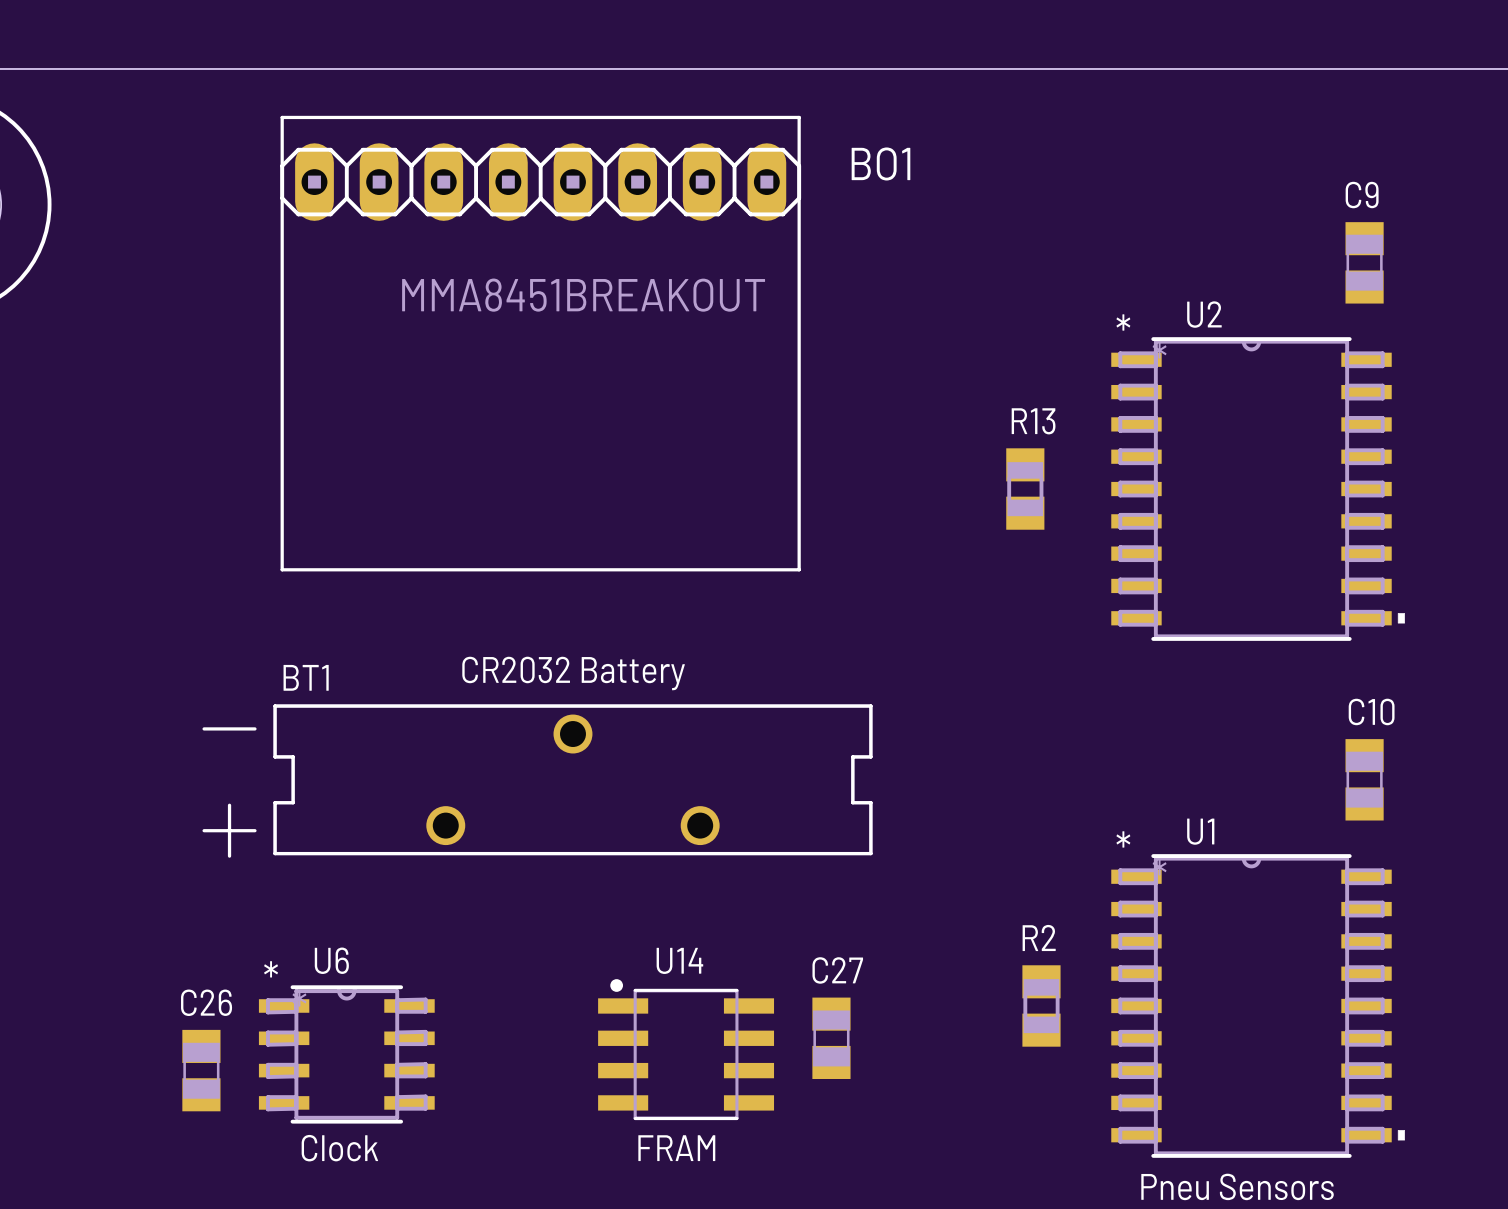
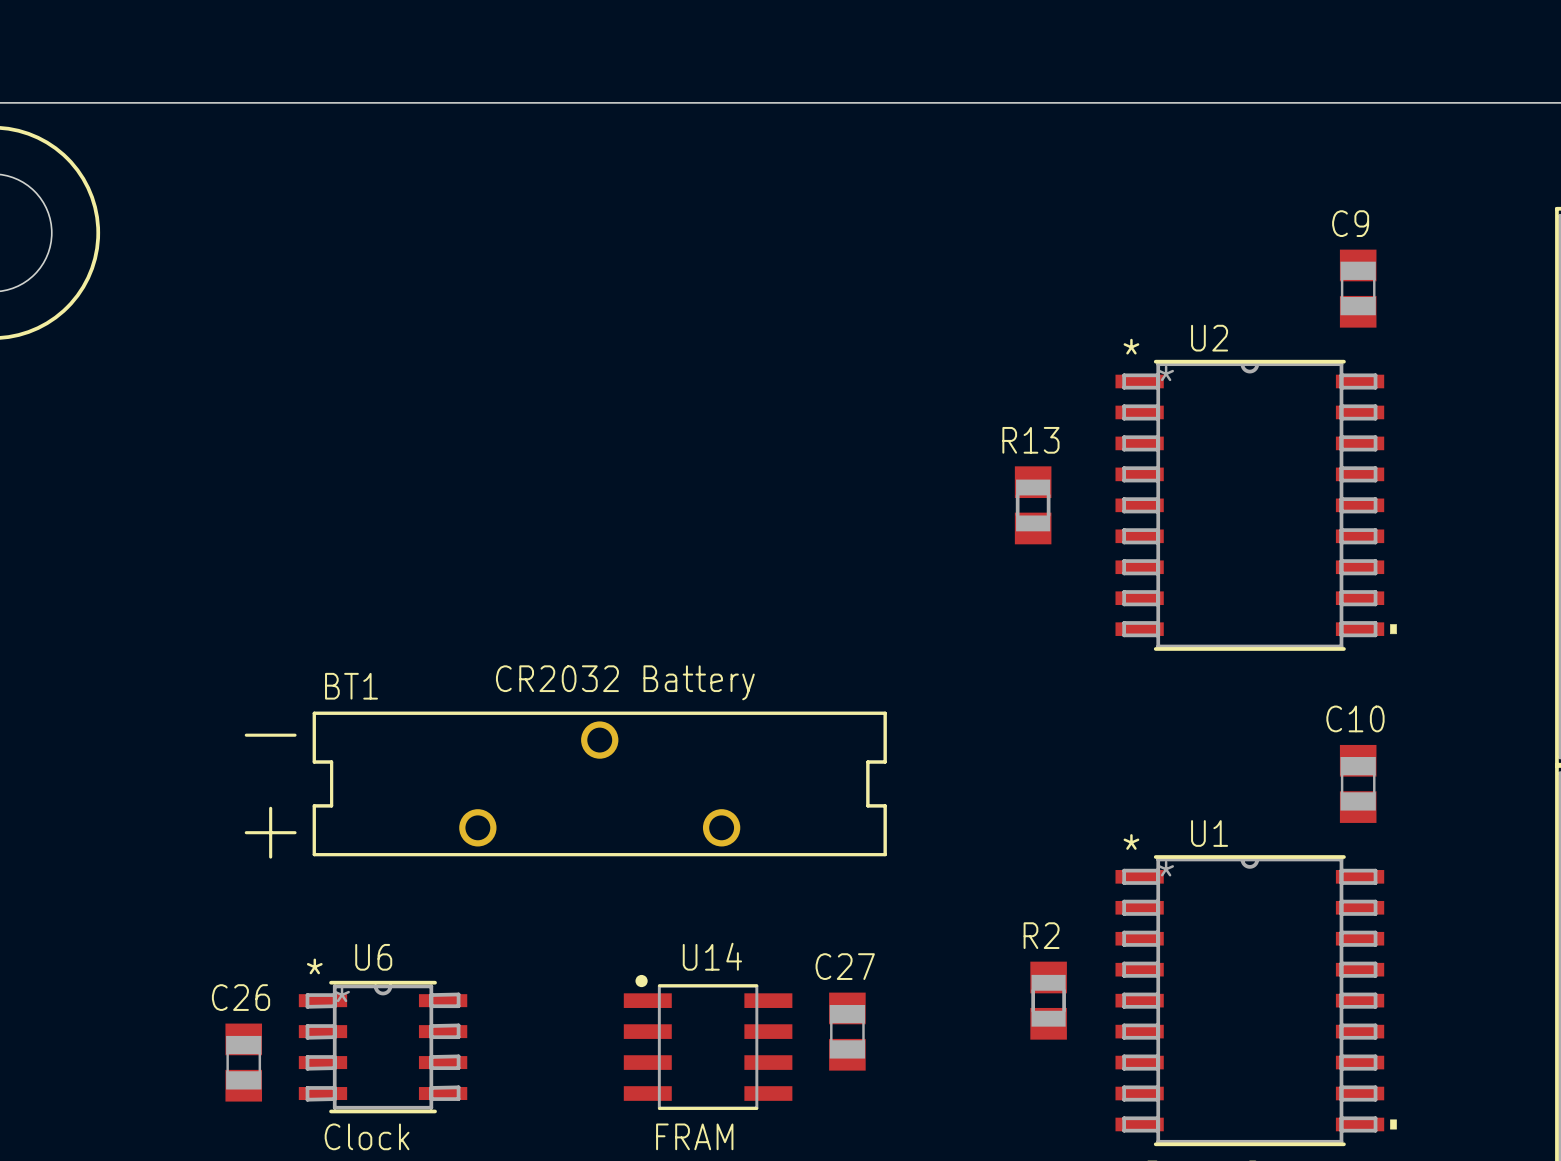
BO1: MMA8451BREAKOUT (540, 343) -> none

